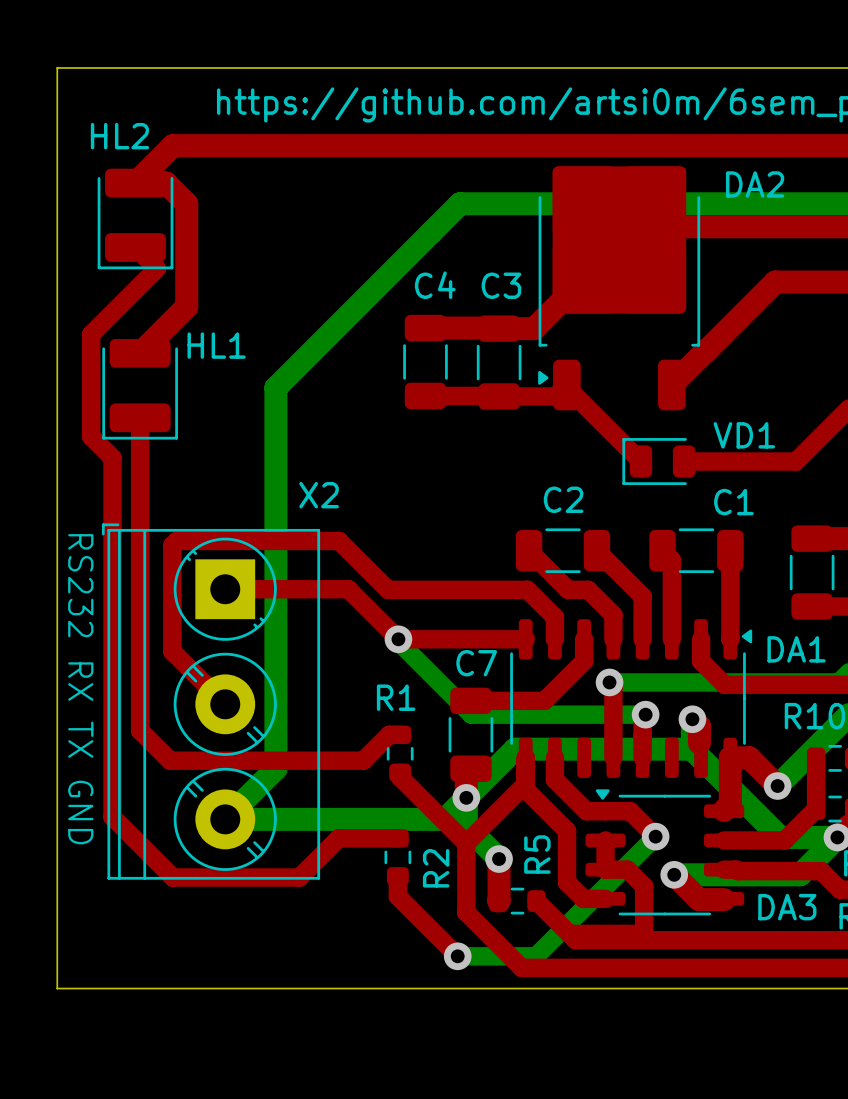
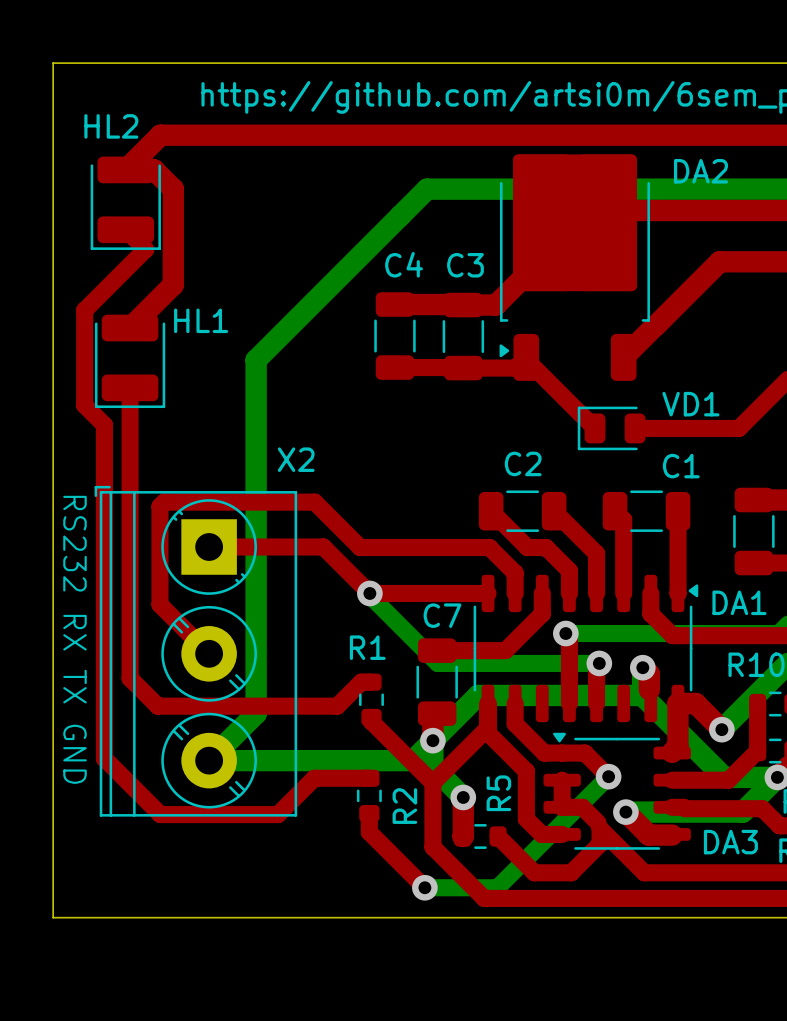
top track: (644, 886) (644, 933) (569, 933) -> none
top track: (615, 940) (694, 940) -> (571, 872) (600, 844) (600, 828) (644, 872)

